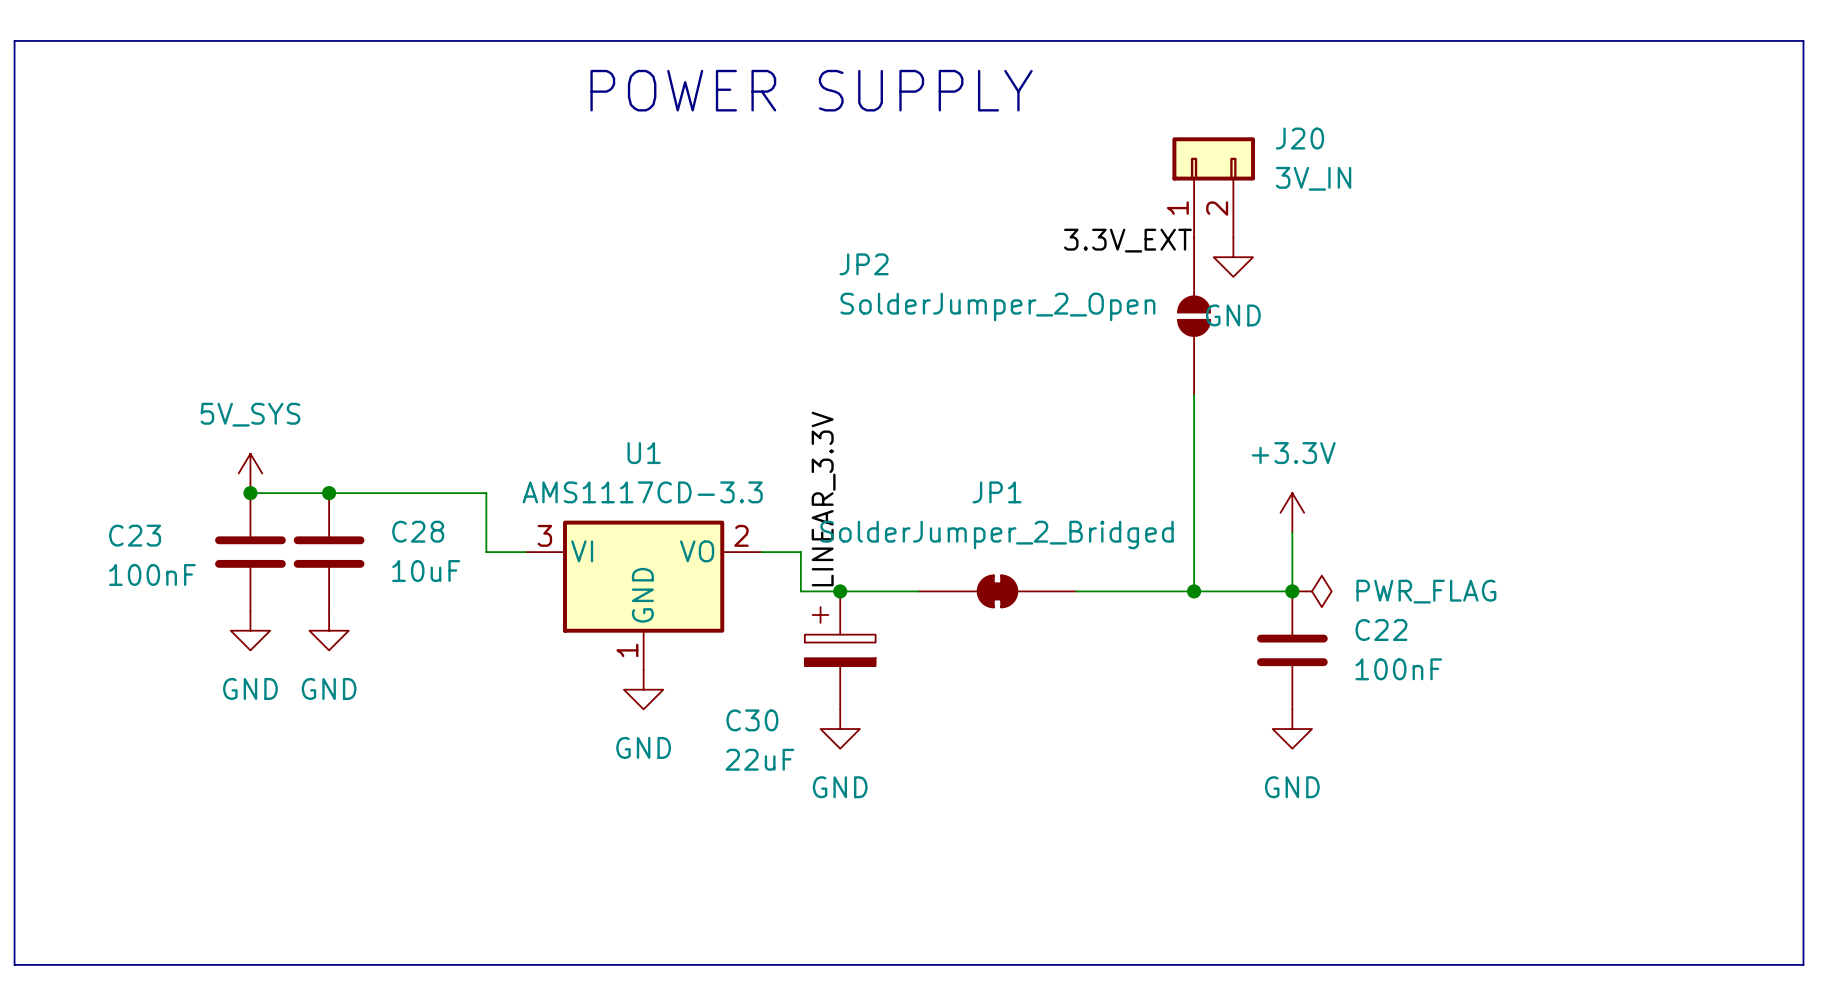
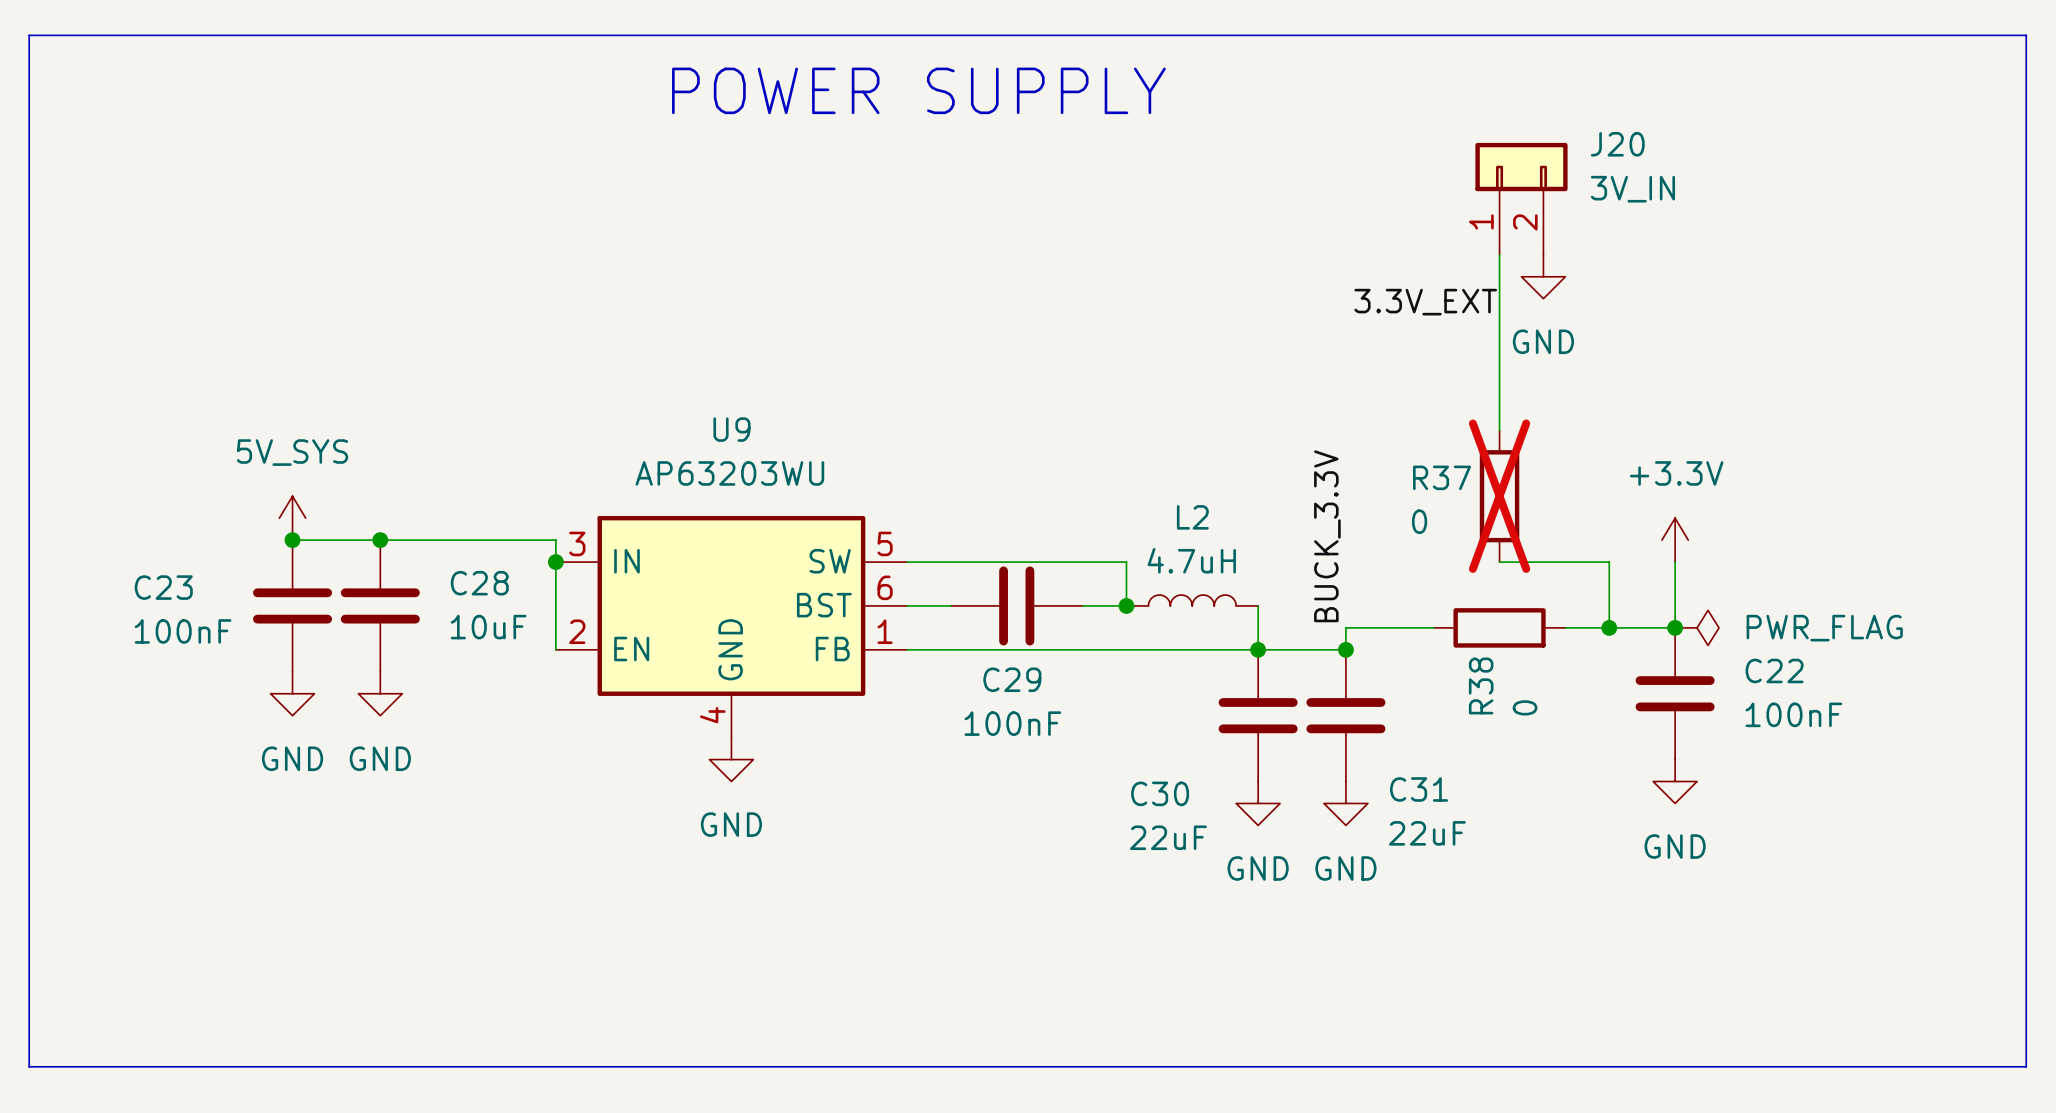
J20 position: (1213, 187) -> (1521, 198)
wire: none -> (1499, 254) (1499, 430)
label position: 3.3V_EXT (1127, 240) -> 3.3V_EXT (1425, 302)
power symbol position: GND (1233, 257) -> GND (1543, 276)
JP2: SolderJumper_2_Open (1194, 316) -> none
wire: (1194, 394) (1194, 571) -> (1433, 627) (1345, 627)
R37: none -> 0 (1499, 496)
label: none -> BUCK_3.3V (1327, 536)
label: LINEAR_3.3V (823, 499) -> none
junction: none -> (555, 562)
wire: none -> (907, 562) (1126, 562) (1126, 605) (1082, 605)
power symbol position: +3.3V (1292, 512) -> +3.3V (1675, 540)
wire: none -> (1499, 562) (1609, 562) (1609, 627)
wire: (1292, 532) (1292, 591) (1194, 591) -> (1675, 562) (1675, 627) (1565, 627)
L2: none -> 4.7uH (1192, 600)
wire: (486, 552) (525, 552) -> (555, 605) (555, 649)
wire: (761, 552) (800, 552) (800, 591) -> none
wire: none -> (907, 605) (950, 605)
C29: none -> 100nF (1016, 605)
junction: none -> (1126, 605)
wire: none -> (1258, 605) (1258, 649)
U9: none -> AP63203WU (731, 626)
R38: none -> 0 (1499, 627)
junction: none -> (1609, 627)
junction: none -> (1675, 627)
C30 symbol: [804, 591, 876, 710] -> [1218, 649, 1298, 782]
junction: (840, 591) -> none
JP1: SolderJumper_2_Bridged (997, 591) -> none
junction: none -> (1258, 649)
junction: (1292, 591) -> none
power symbol position: PWR_FLAG (1312, 591) -> PWR_FLAG (1697, 627)
U1: AMS1117CD-3.3 (643, 595) -> none
C31: none -> 22uF (1345, 715)
C22 position: (1292, 650) -> (1675, 693)
power symbol: none -> GND (1675, 781)
power symbol: GND (840, 729) -> none
power symbol: none -> GND (1258, 803)
power symbol: none -> GND (1345, 803)
power symbol: GND (1292, 729) -> none

